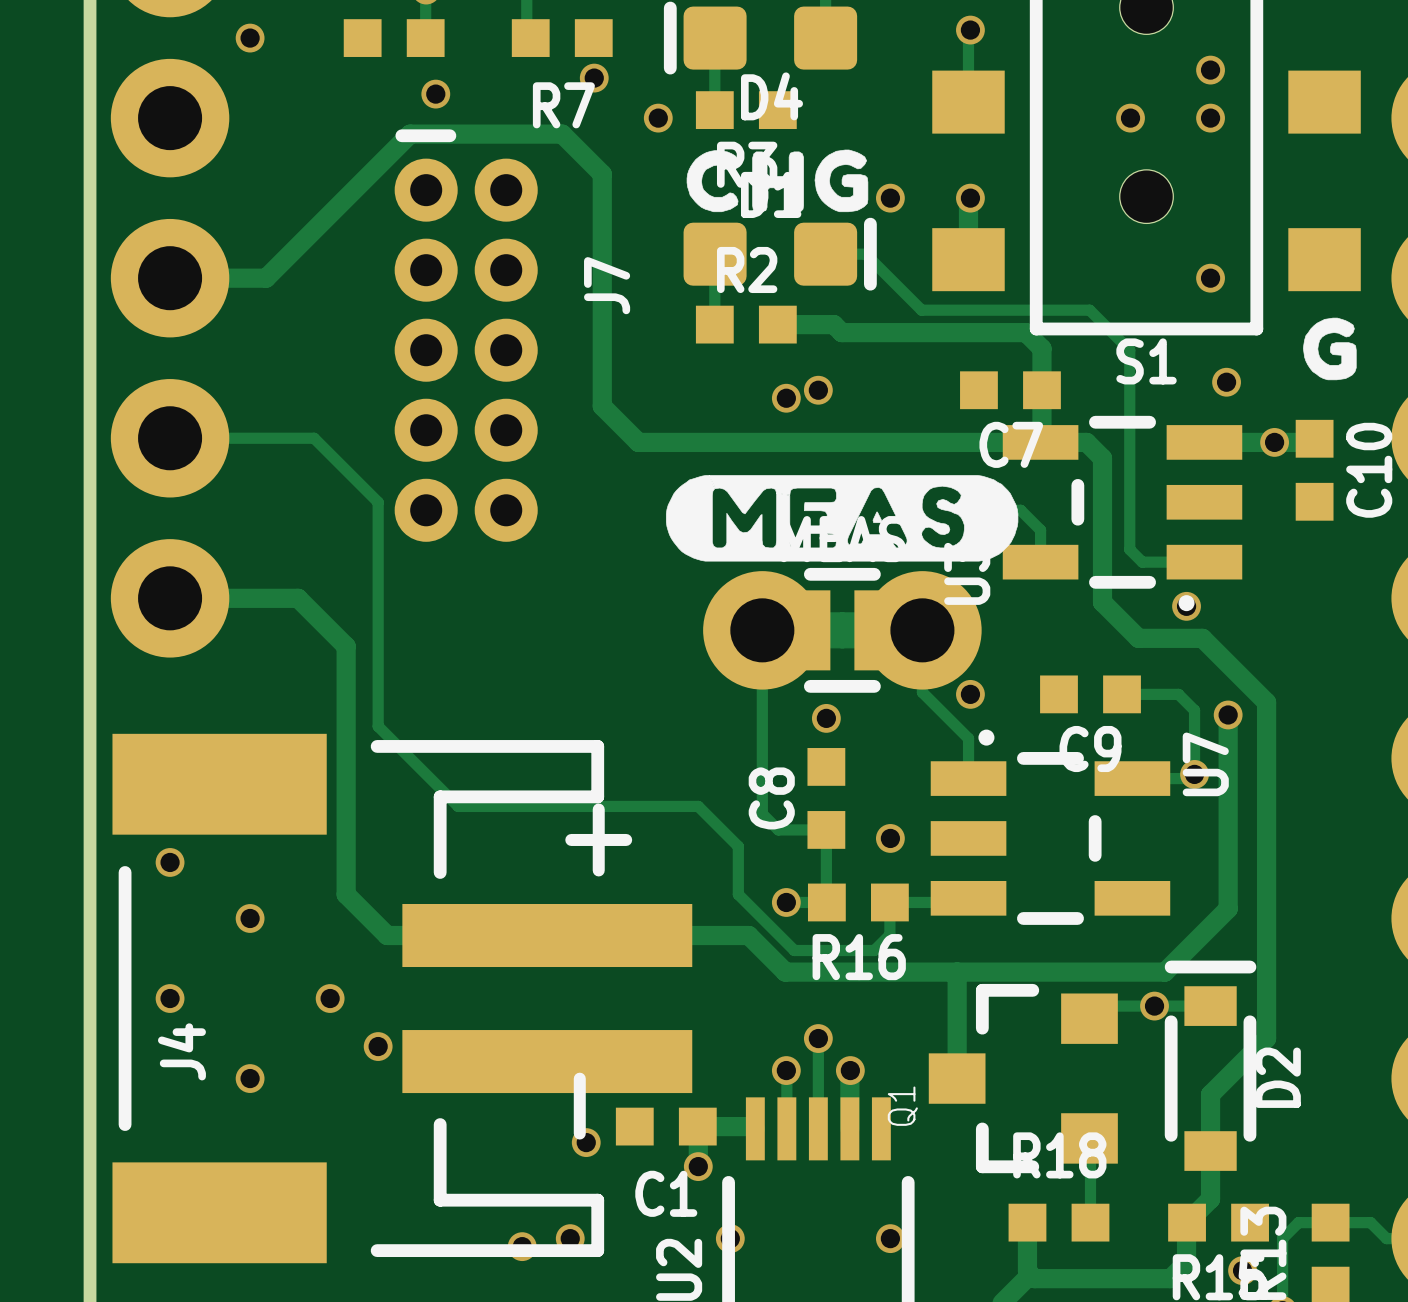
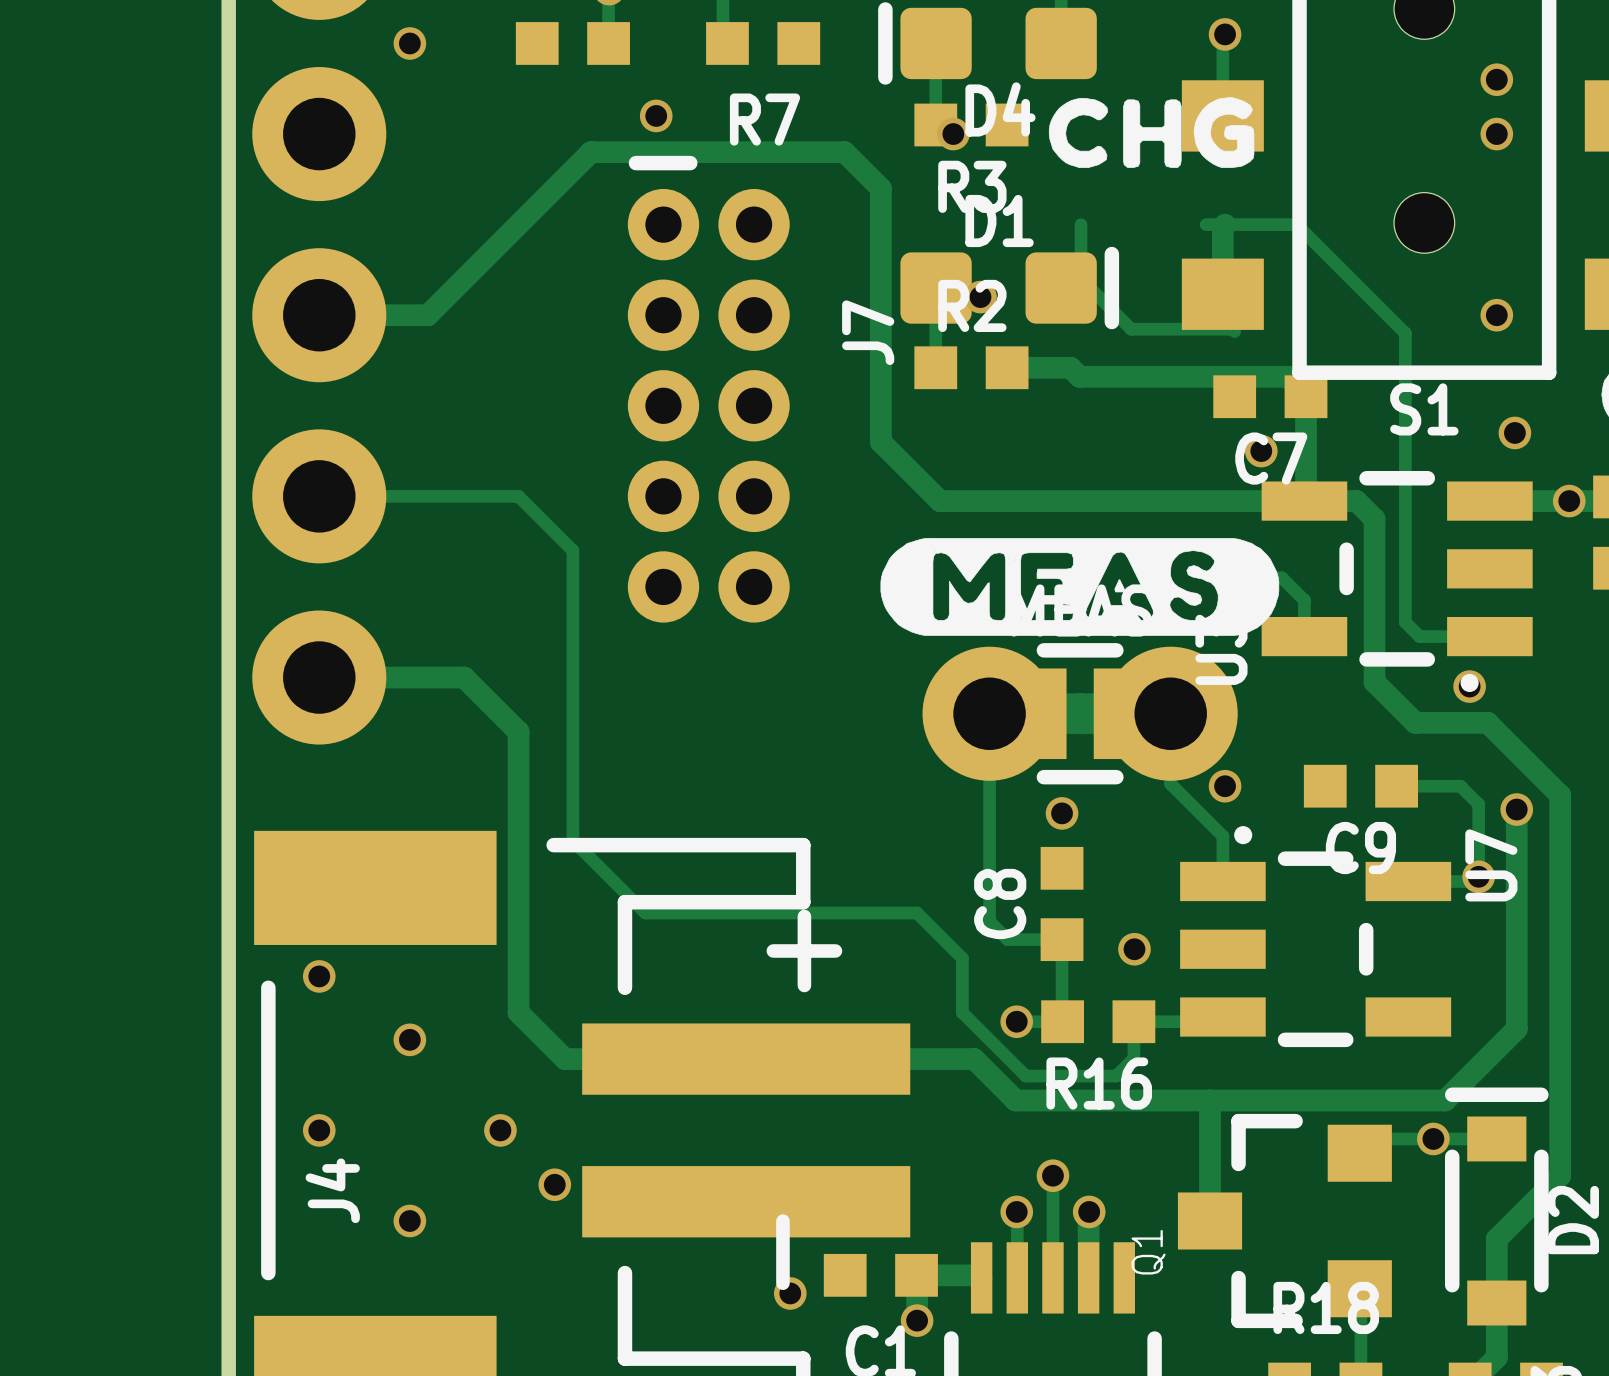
via: (594, 78) -> none
via position: (435, 94) -> (656, 115)
via: (658, 118) -> none
via: none -> (953, 134)
via: (1130, 118) -> none
track: (562, 134) (602, 174) (602, 406) (638, 442) (718, 442) -> (763, 152) (844, 152) (880, 188) (880, 442) (939, 501)
drawing position: (777, 180) -> (1151, 132)
track: none -> (1080, 224) (1080, 278) (1131, 329) (1232, 329) (1234, 331)
via: (890, 198) -> none
via: (970, 198) -> none
track: (825, 254) (865, 254) (921, 310) (1089, 310) (1129, 350) -> (1206, 224) (1296, 224) (1405, 333) (1405, 396)
via: none -> (980, 297)
J7 position: (466, 335) -> (708, 389)
via: (818, 390) -> none
C7 position: (1010, 390) -> (1270, 396)
via: (786, 398) -> none
via: none -> (1261, 451)
track: (314, 438) (378, 502) (378, 726) (394, 742) -> (482, 496) (518, 496) (572, 550) (572, 840)

